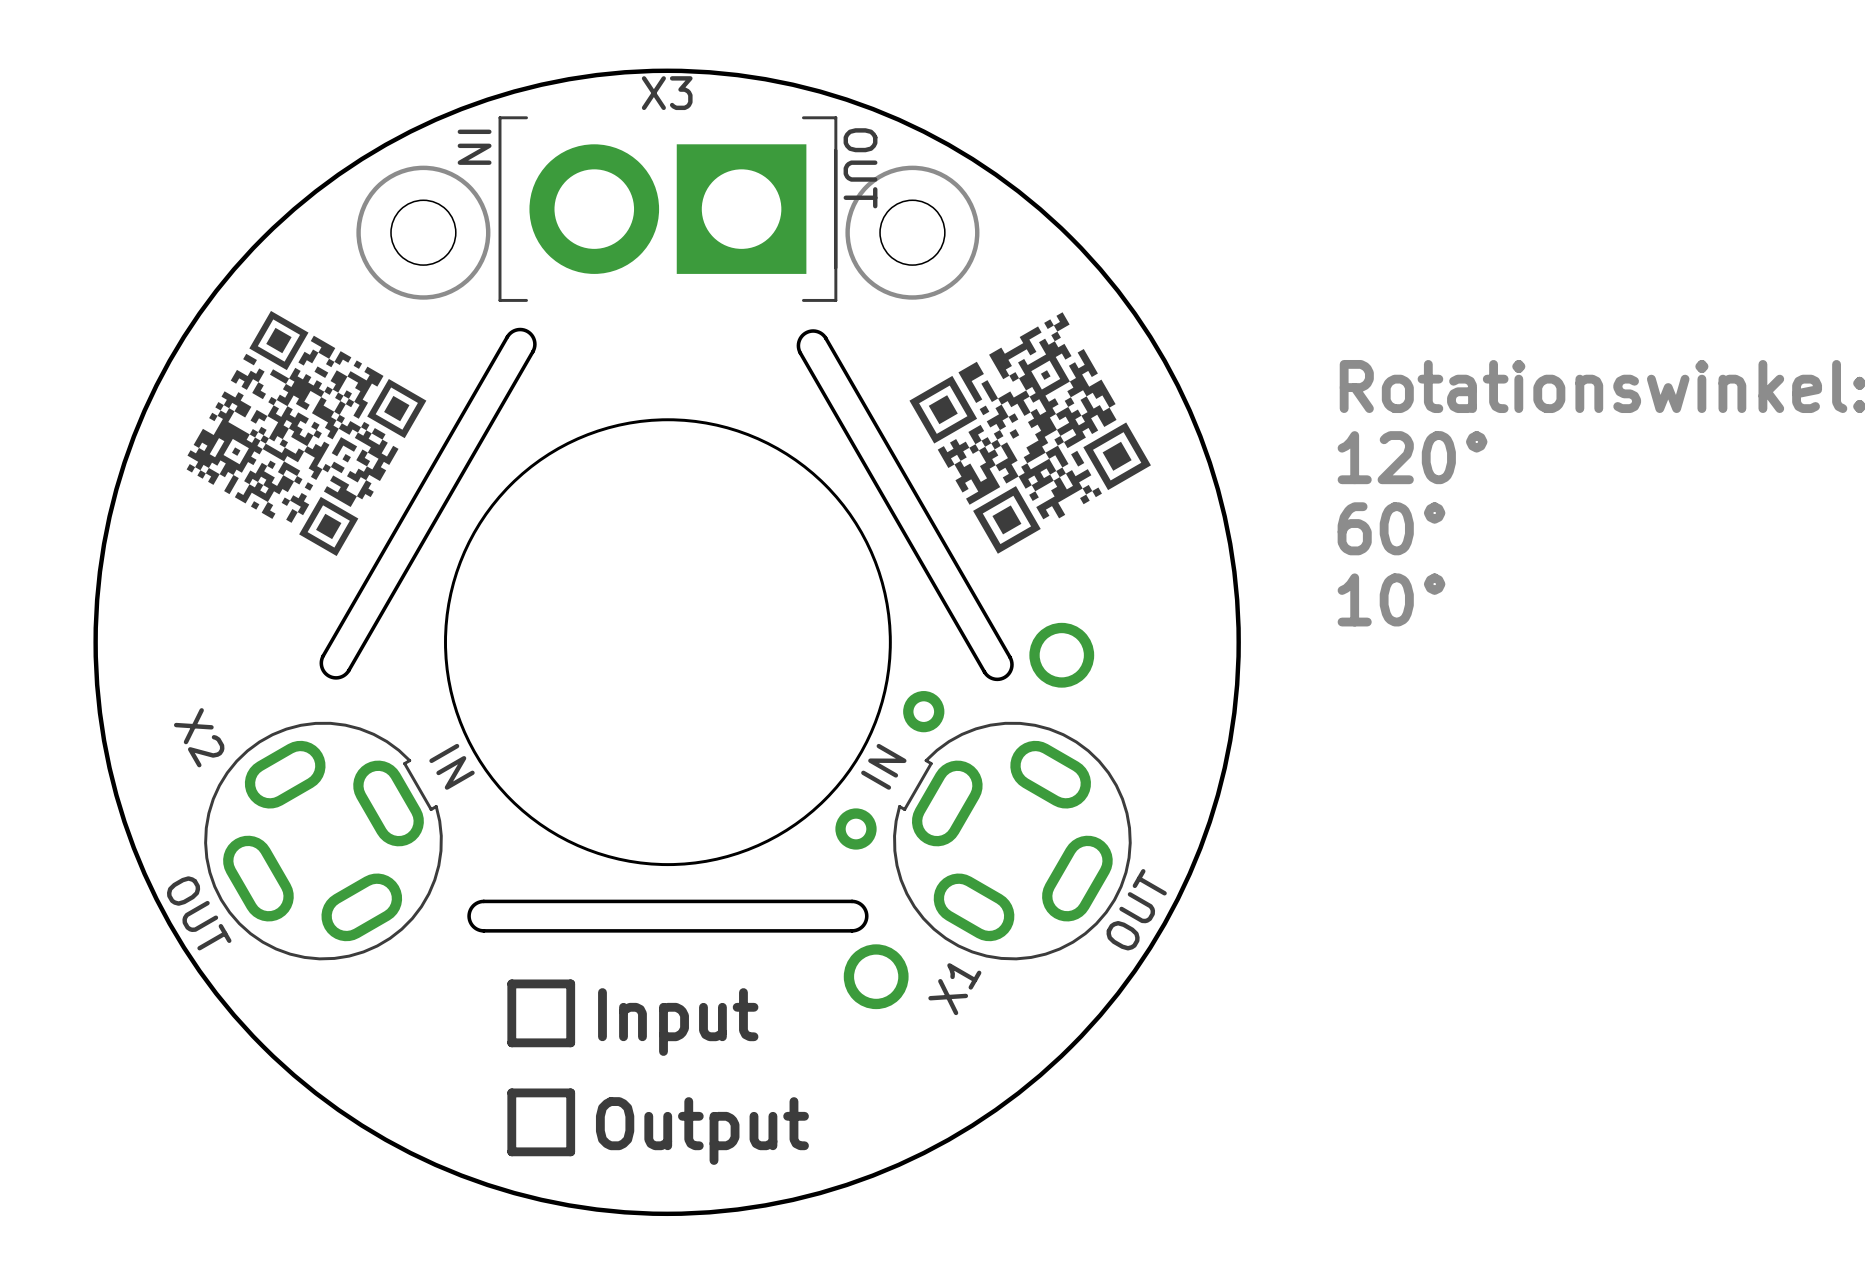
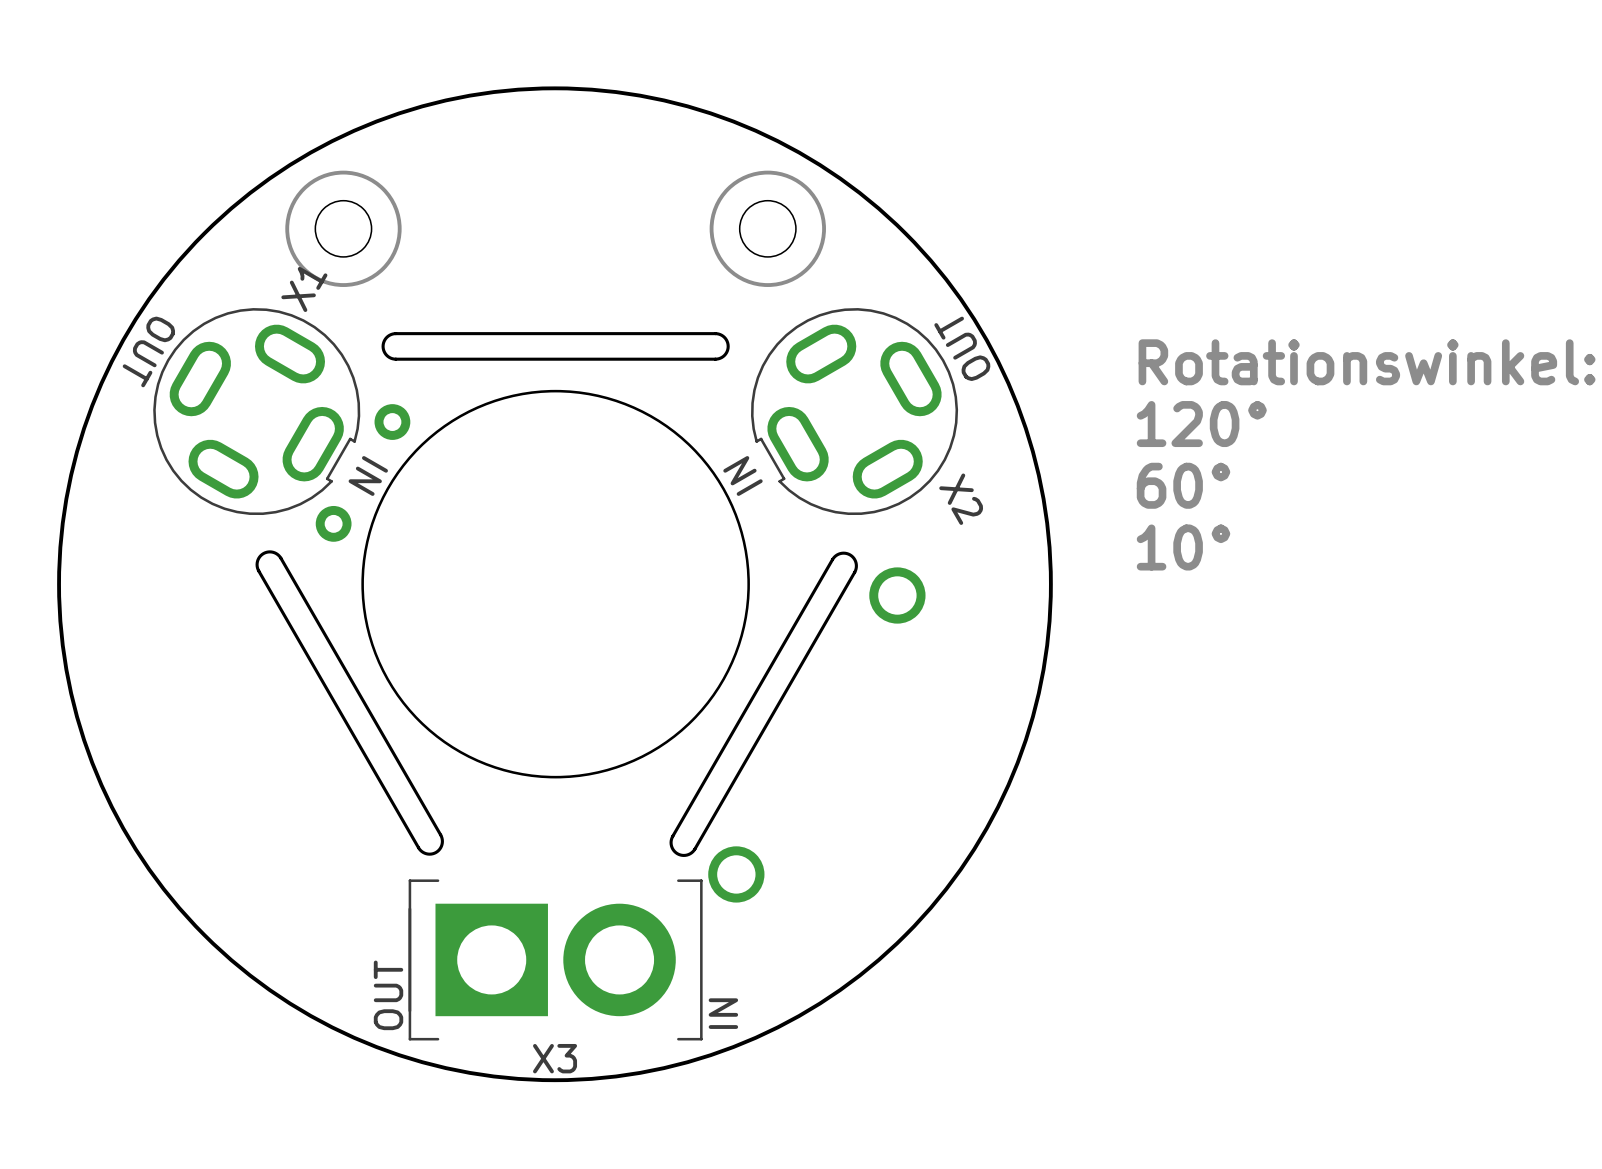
text: IN (474, 147) -> none
text: OUT (860, 168) -> none
X3 rotation: 0° (667, 209) -> 180° (555, 959)
X3 position: (667, 209) -> (555, 959)
drawing: [186, 310, 427, 557] -> none
drawing: [909, 312, 1151, 554] -> none
text: none -> OUT (962, 348)
text: none -> OUT (148, 351)
part: none -> (392, 422)
part position: (428, 503) -> (763, 704)
part position: (905, 505) -> (349, 703)
text: none -> IN (368, 475)
text: none -> IN (742, 475)
part: none -> (333, 523)
part: (923, 711) -> none
text: IN (452, 766) -> none
text: IN (883, 766) -> none
part: (856, 829) -> none
X2 rotation: 0° (323, 841) -> 180° (854, 411)
X2 position: (323, 841) -> (854, 411)
X1 rotation: 0° (1012, 841) -> 180° (256, 411)
X1 position: (1012, 841) -> (256, 411)
text: OUT (1136, 909) -> none
text: OUT (199, 913) -> none
part position: (667, 916) -> (555, 346)
line: (511, 983) (570, 983) (570, 1042) (511, 1042) (511, 983) -> none
text: Input (678, 1022) -> none
line: (511, 1092) (511, 1151) (570, 1151) (570, 1092) (511, 1092) -> none
text: none -> OUT (388, 995)
text: Output (702, 1131) -> none
text: none -> IN (723, 1013)

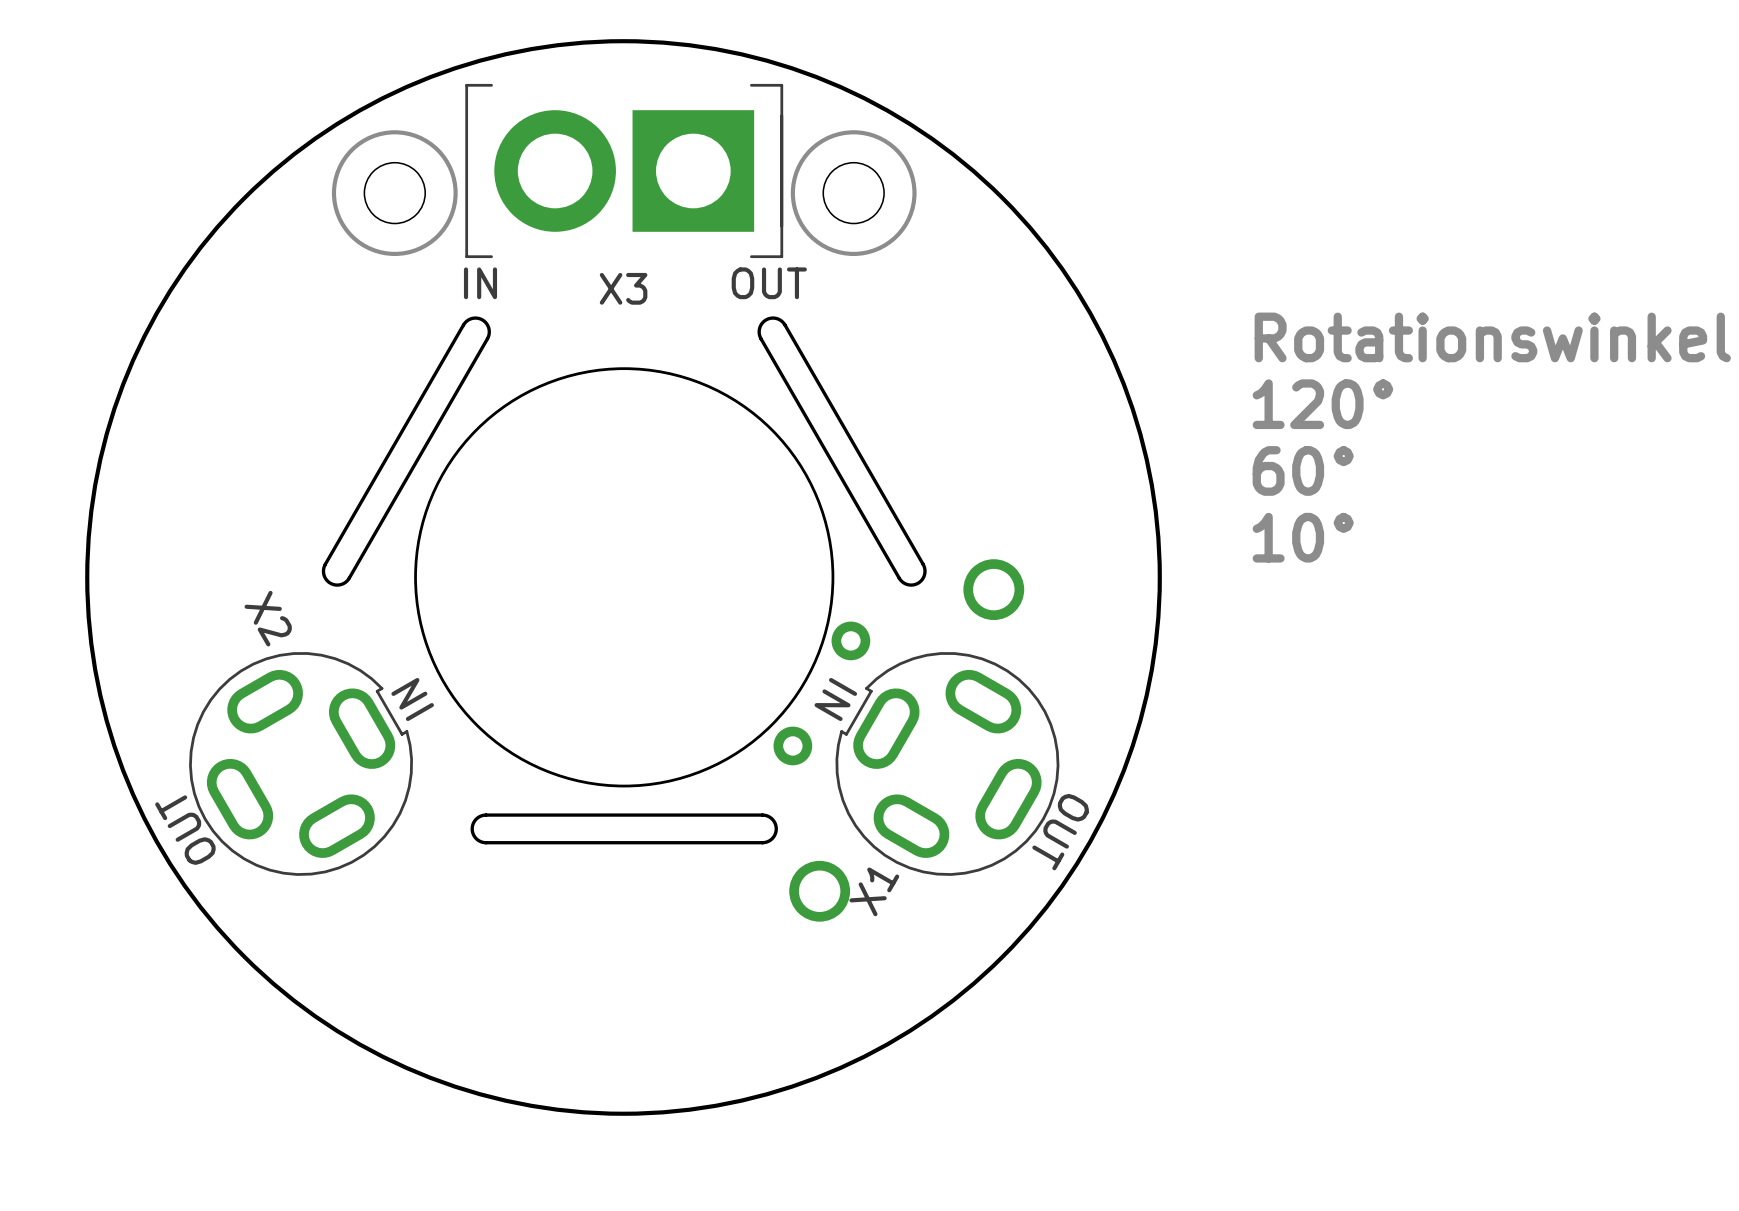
text: none -> IN (480, 283)
text: none -> OUT (769, 283)
part: (555, 346) -> none
text: OUT (962, 348) -> none
text: OUT (148, 351) -> none
X1 rotation: 0° (256, 411) -> 180° (947, 764)
X1 position: (256, 411) -> (947, 764)
X2 rotation: 0° (854, 411) -> 180° (301, 764)
X2 position: (854, 411) -> (301, 764)
part: (392, 422) -> none
part: none -> (406, 451)
part: none -> (842, 451)
text: IN (368, 475) -> none
text: IN (742, 475) -> none
X2 name position: X2 (961, 499) -> X2 (268, 618)
part: (333, 523) -> none
part: none -> (850, 640)
text: none -> IN (412, 699)
text: none -> IN (835, 699)
part: (349, 703) -> none
part: (763, 704) -> none
part: none -> (792, 745)
part: none -> (624, 828)
text: none -> OUT (185, 830)
text: none -> OUT (1060, 832)
X3 rotation: 0° (555, 959) -> 180° (624, 170)
X3 position: (555, 959) -> (624, 170)
text: OUT (388, 995) -> none
text: IN (723, 1013) -> none

